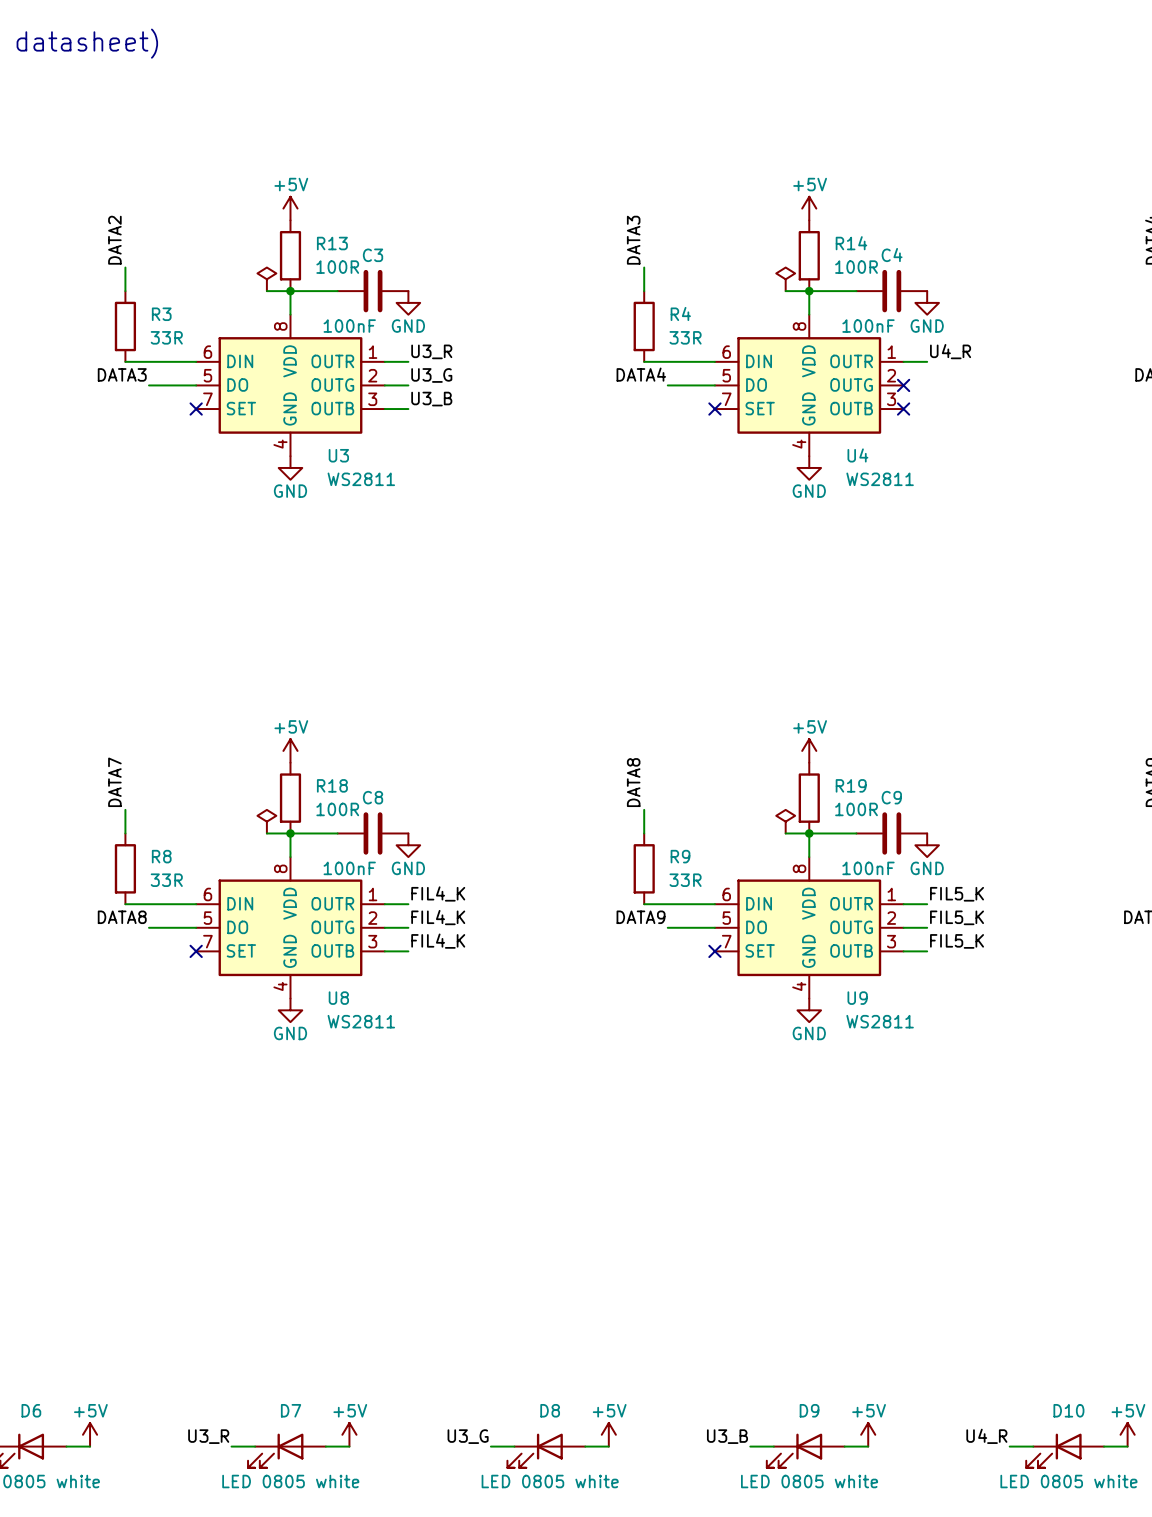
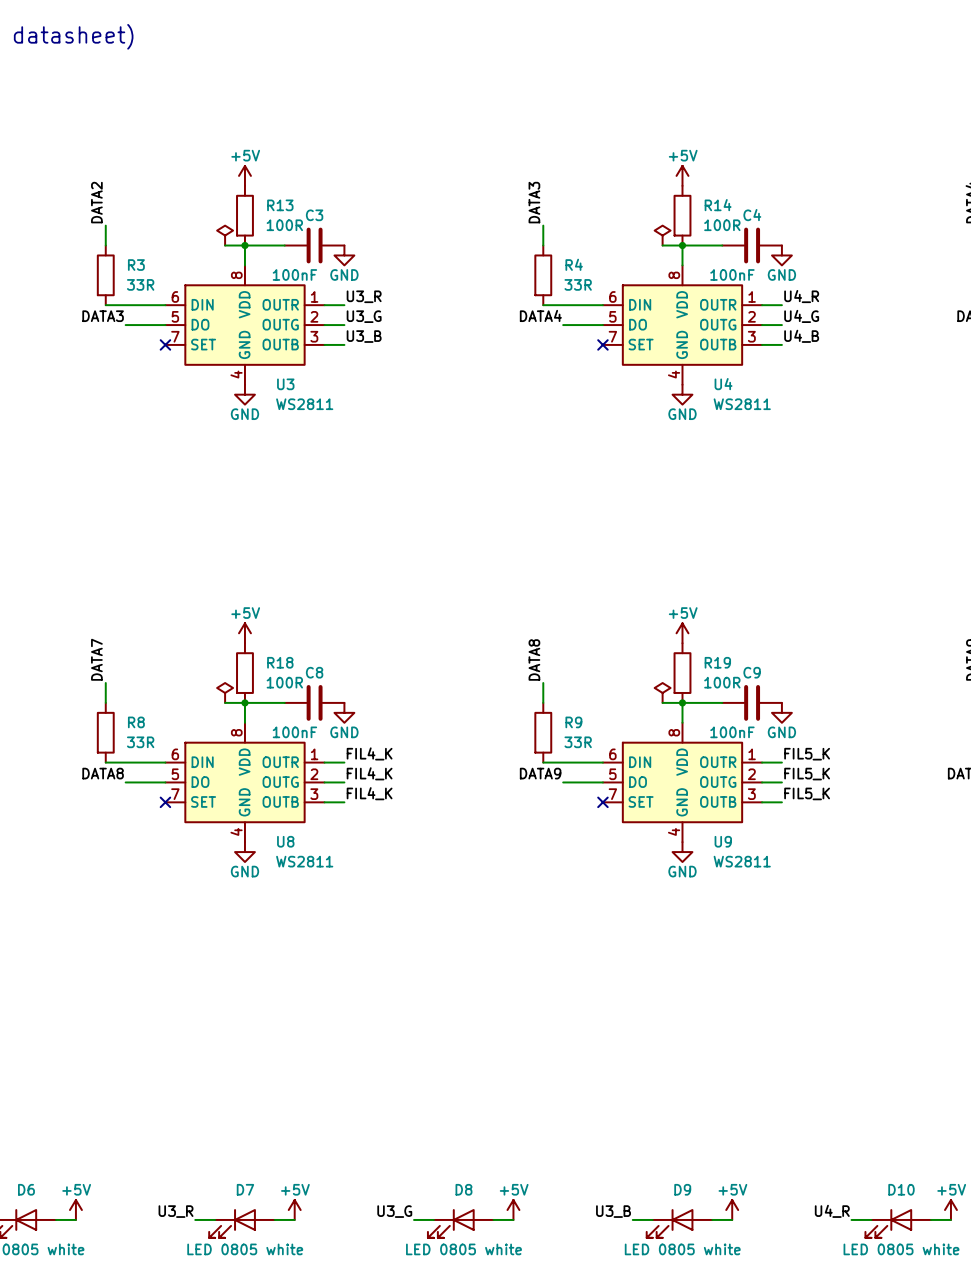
label: none -> U4_G (801, 316)
wire: none -> (762, 325) (781, 325)
no-connect mark: (903, 385) -> none
label: none -> U4_B (801, 336)
wire: none -> (762, 344) (781, 344)
no-connect mark: (903, 409) -> none

